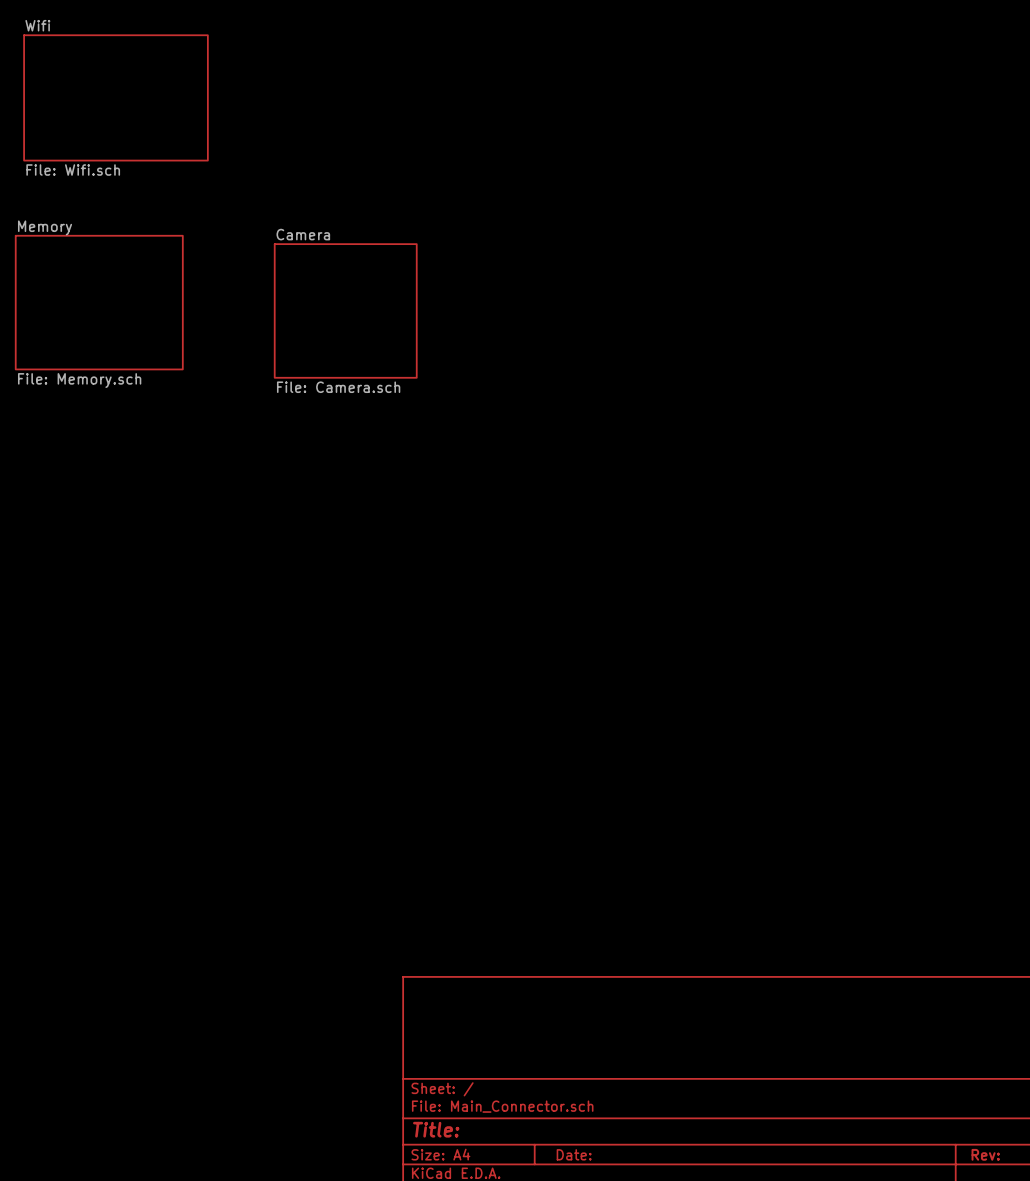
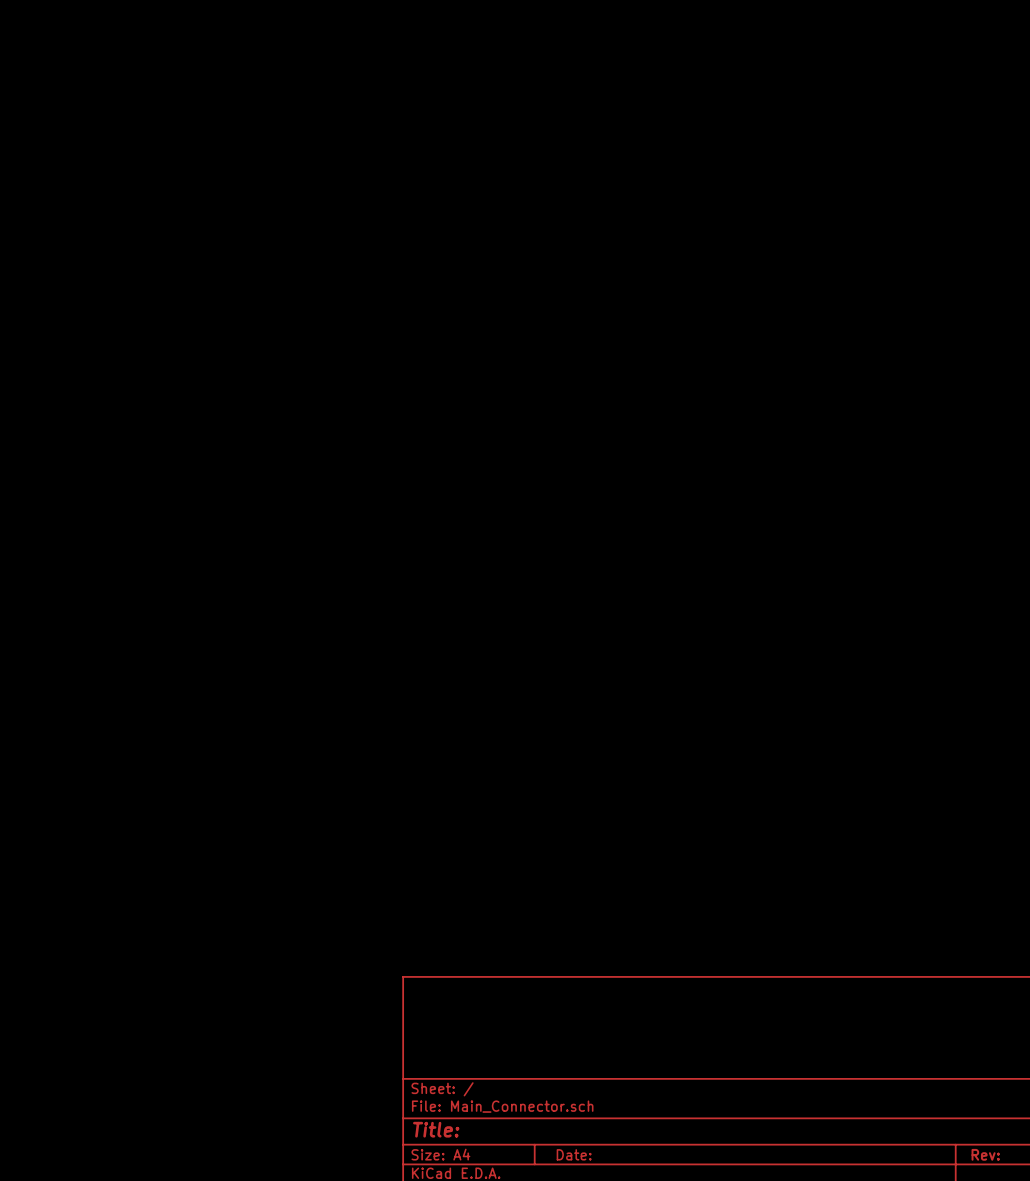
sheet Wifi: File: Wifi.sch (115, 97) -> none
sheet Memory: File: Memory.sch (99, 302) -> none
sheet Camera: File: Camera.sch (345, 310) -> none

